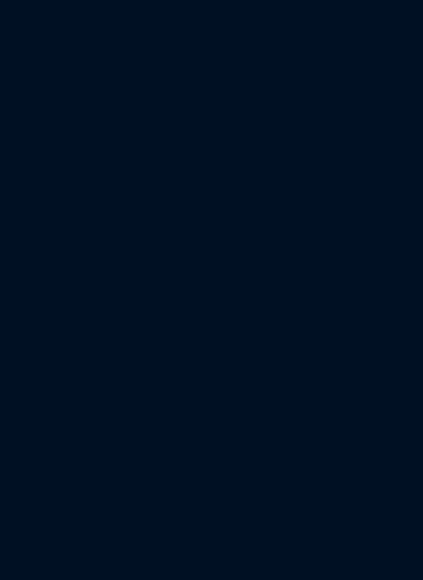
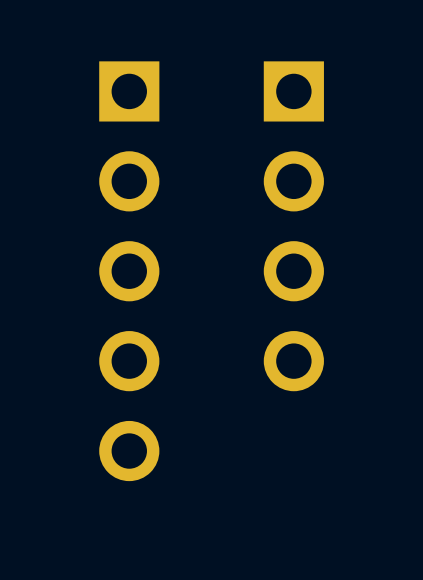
part: none -> (293, 226)
part: none -> (129, 271)

